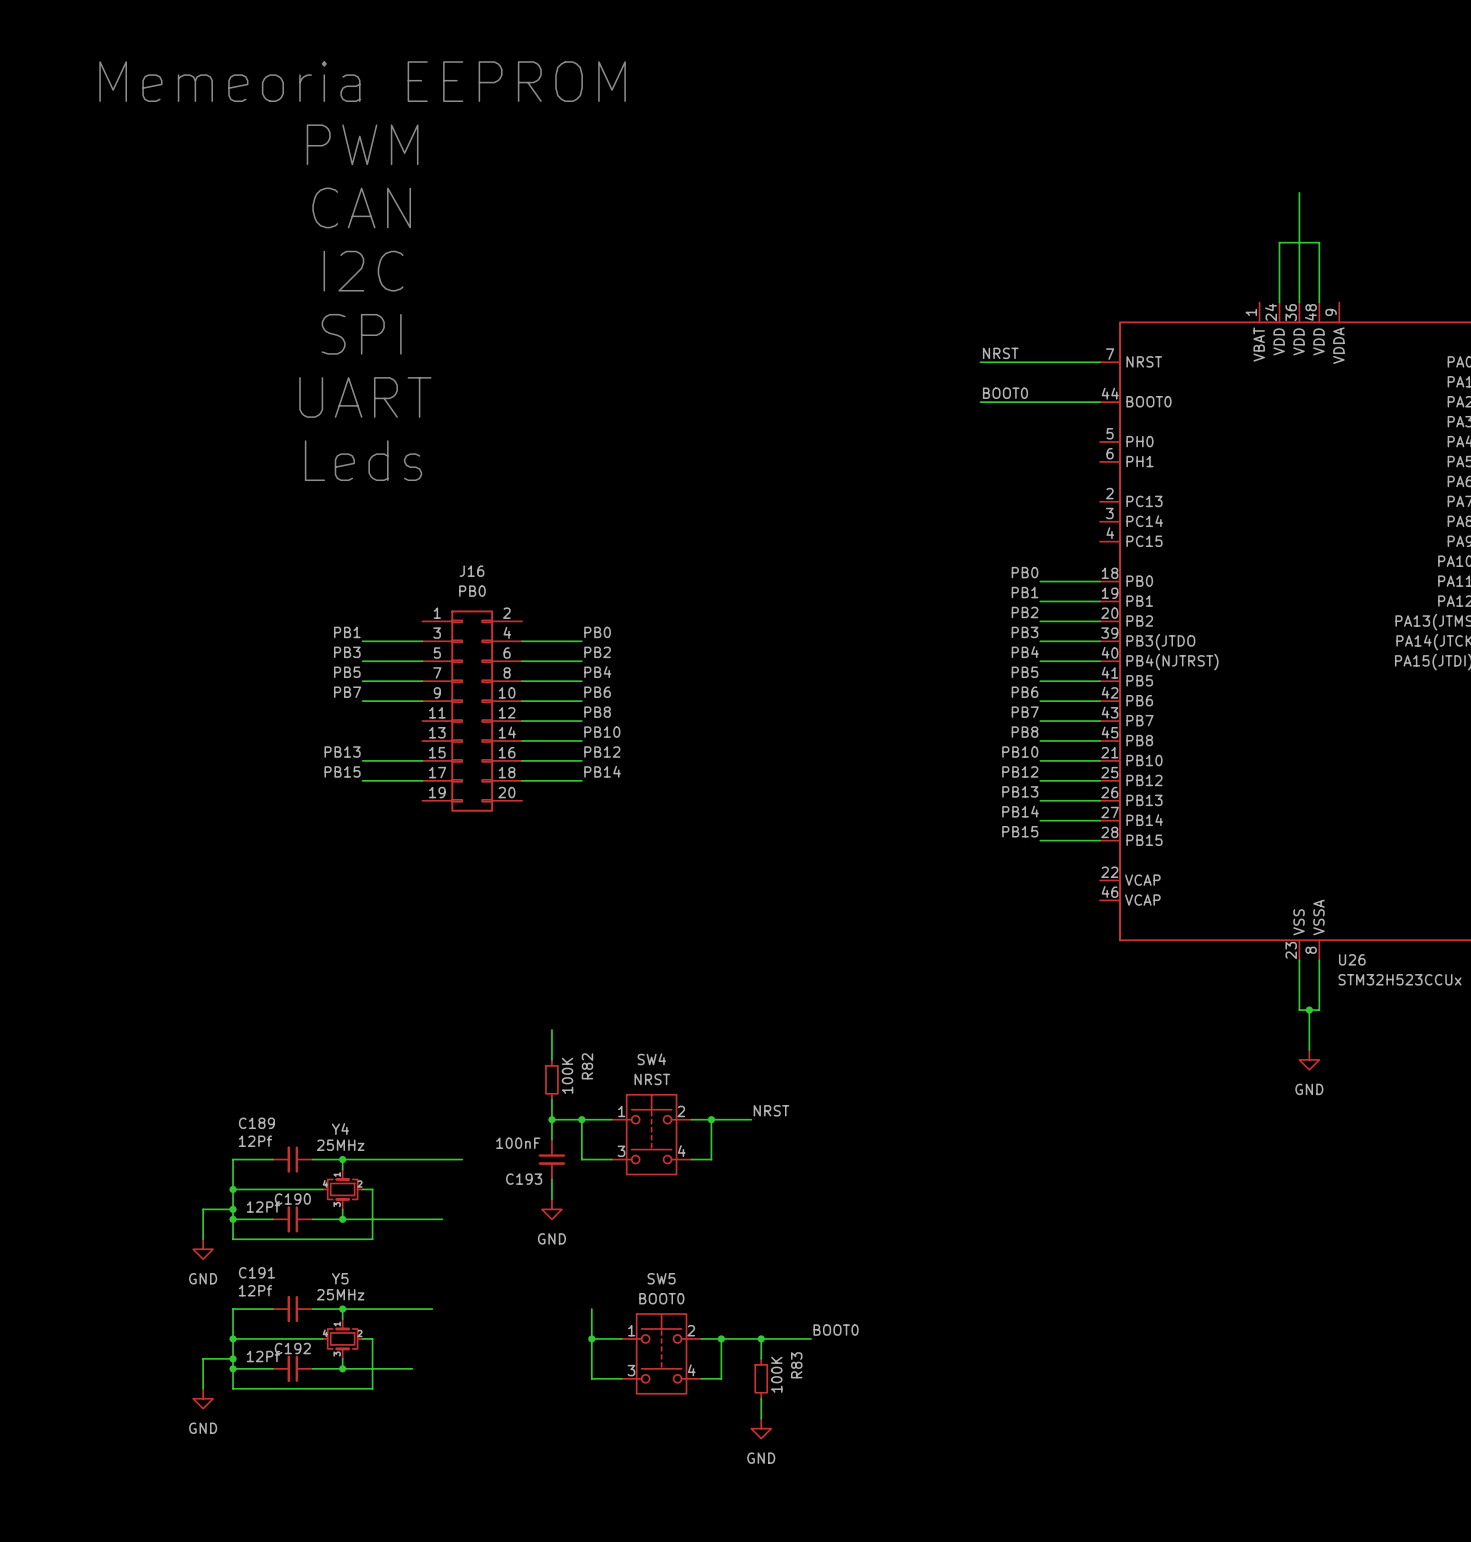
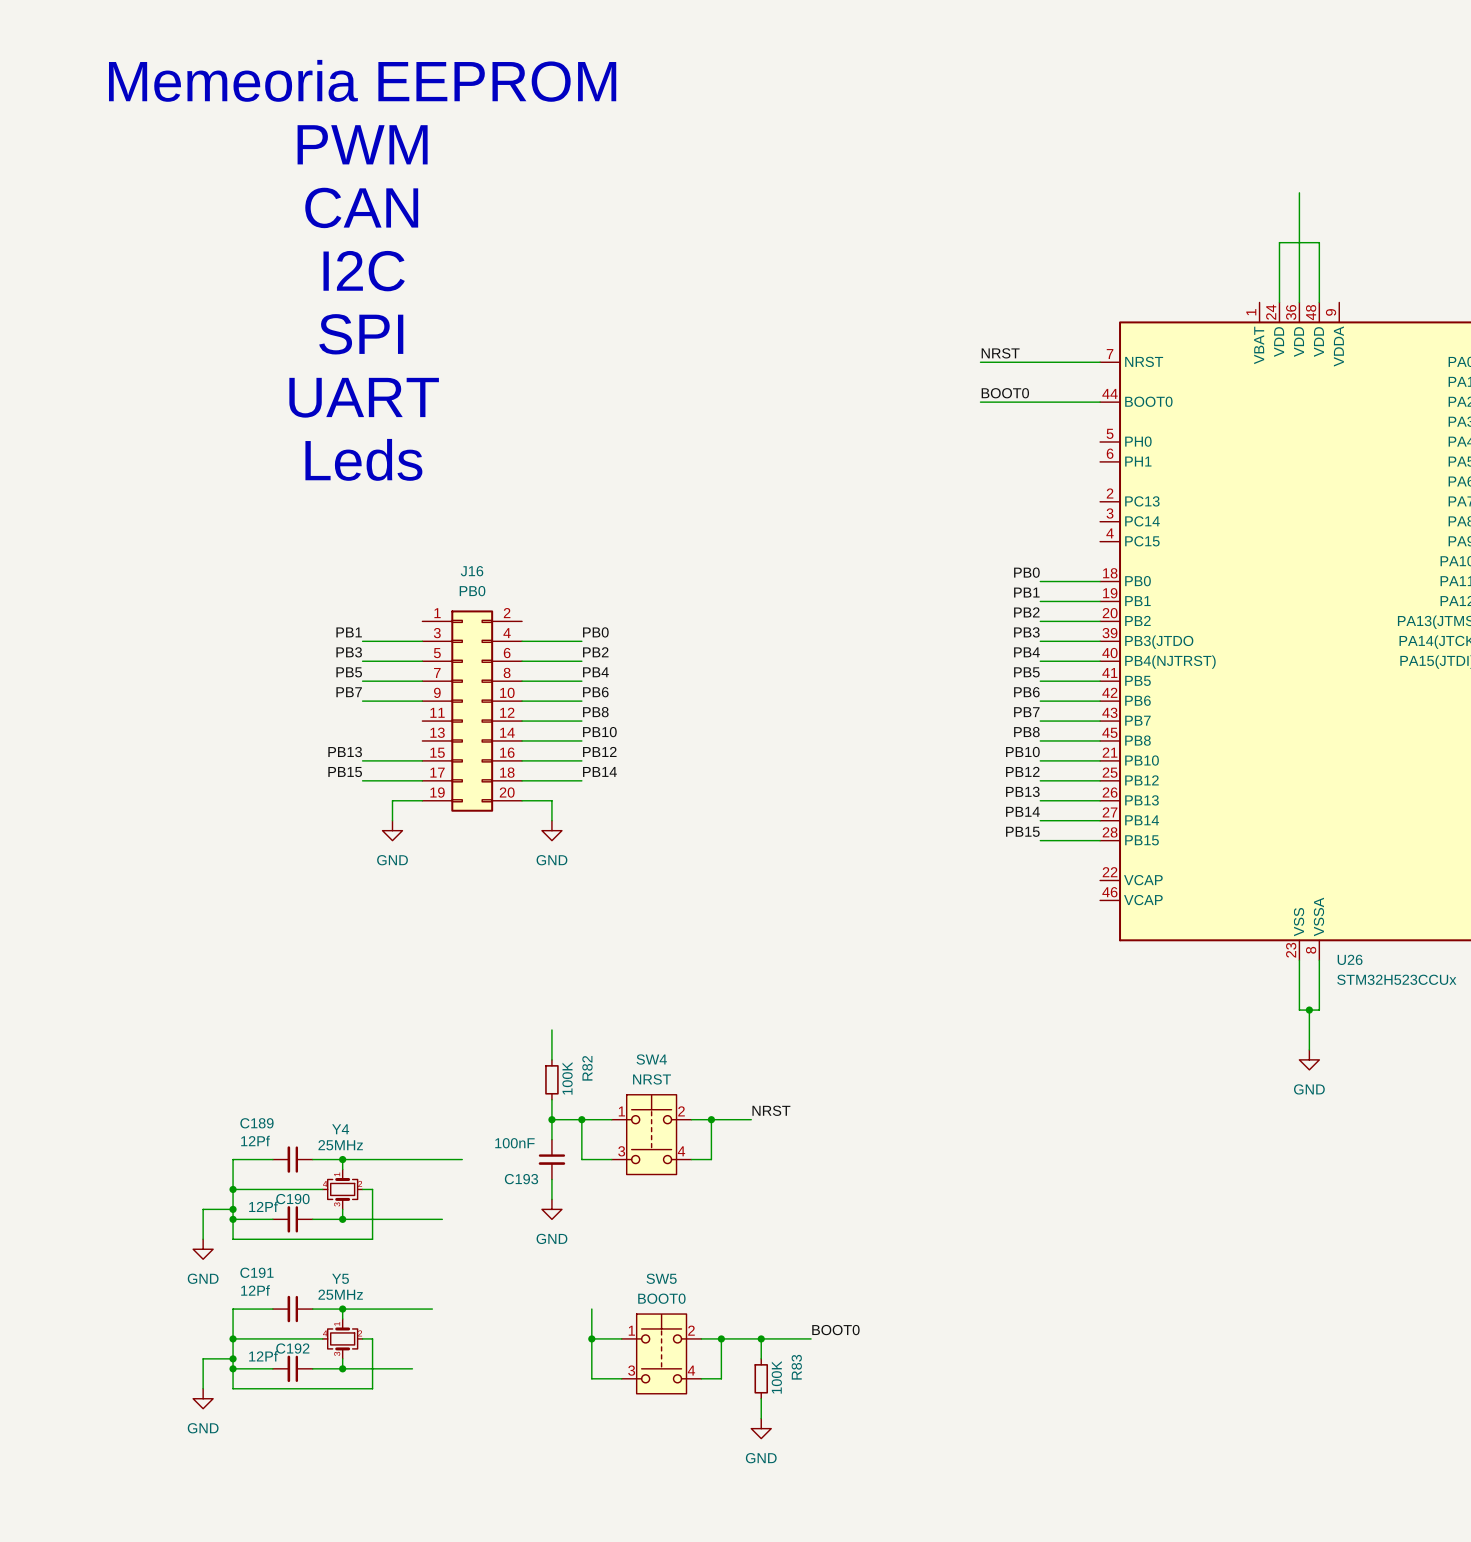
wire: none -> (422, 800) (392, 800) (392, 820)
wire: none -> (522, 800) (551, 800) (551, 820)
power symbol: none -> GND (392, 830)
power symbol: none -> GND (551, 830)

